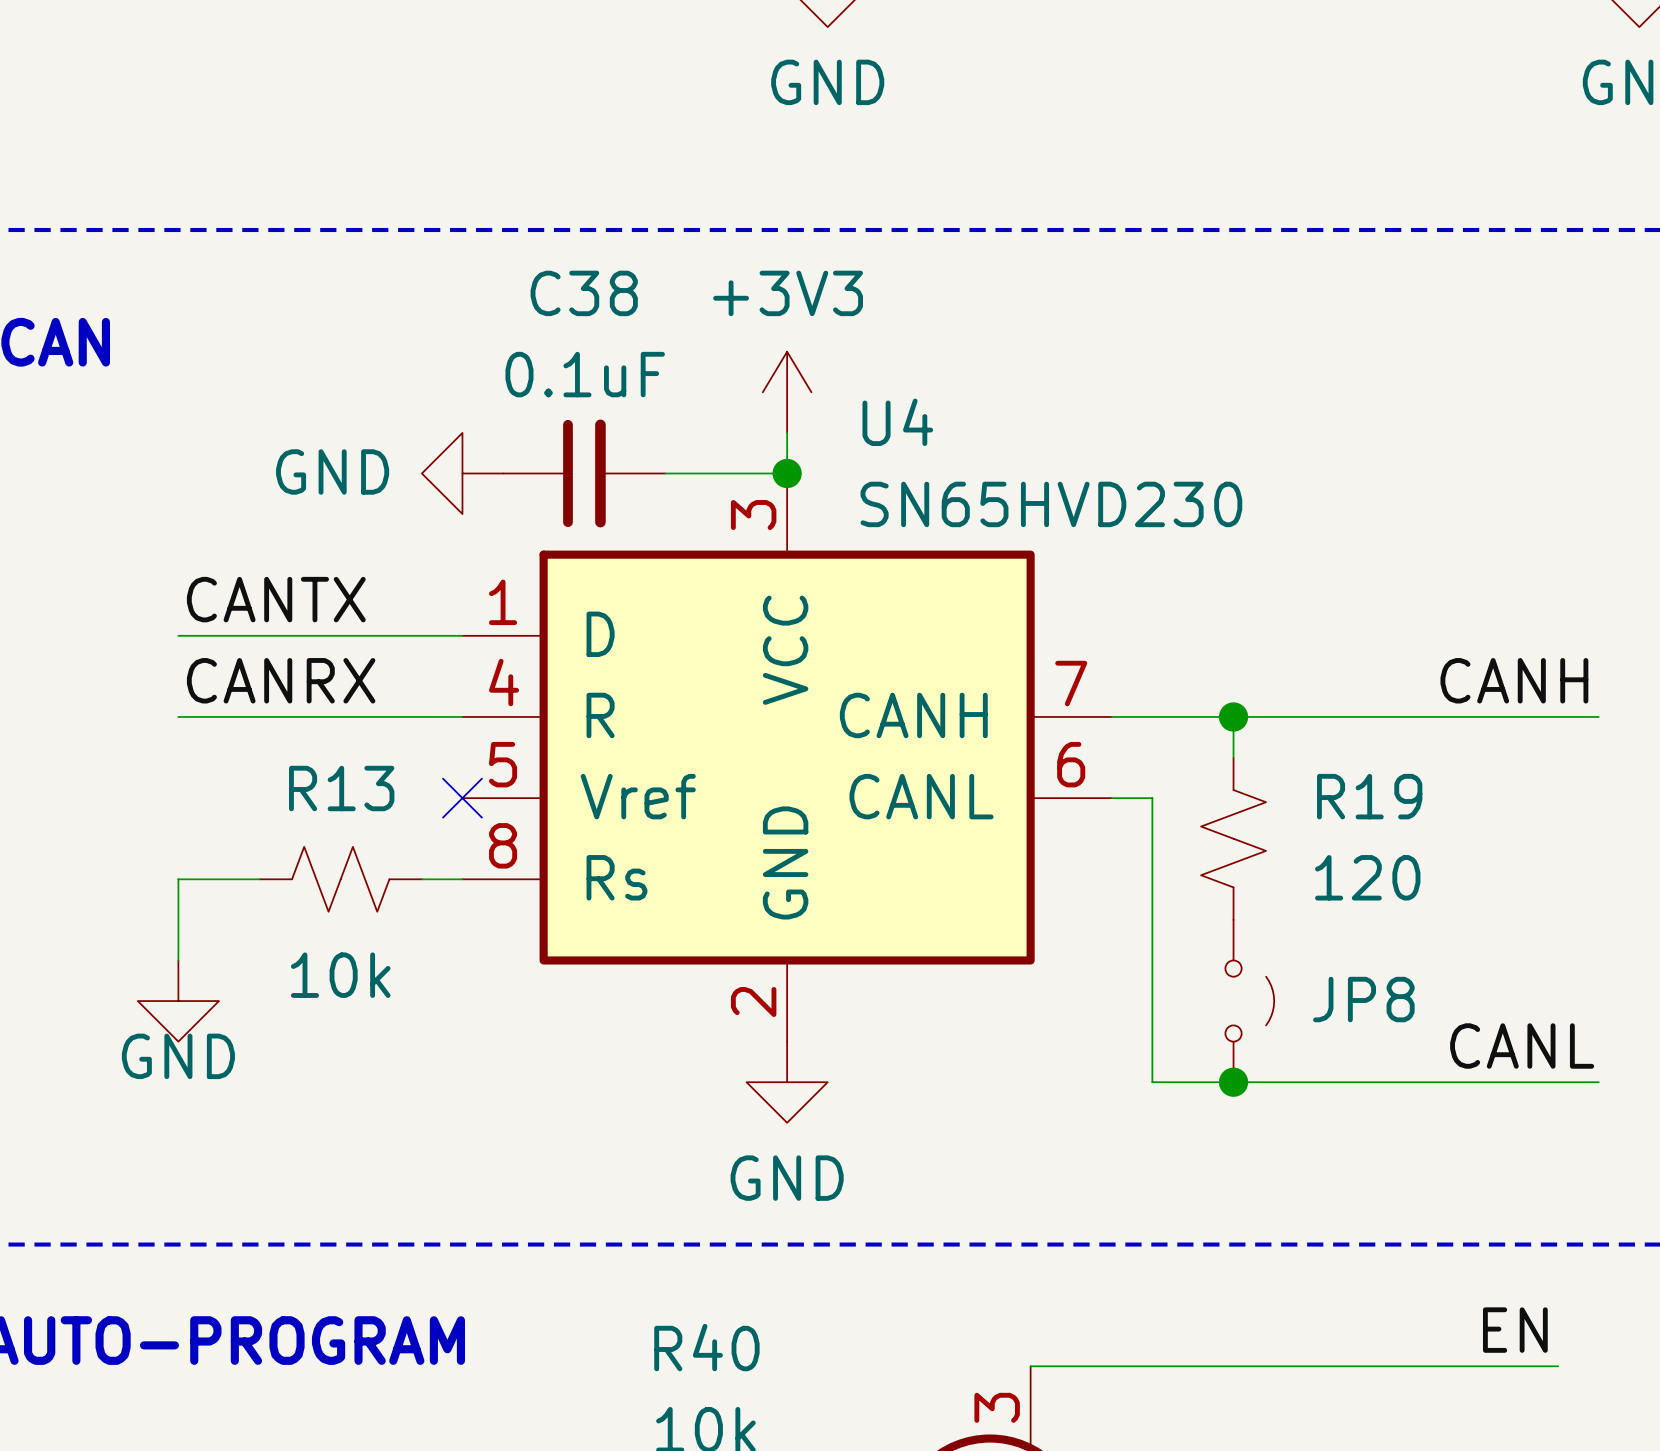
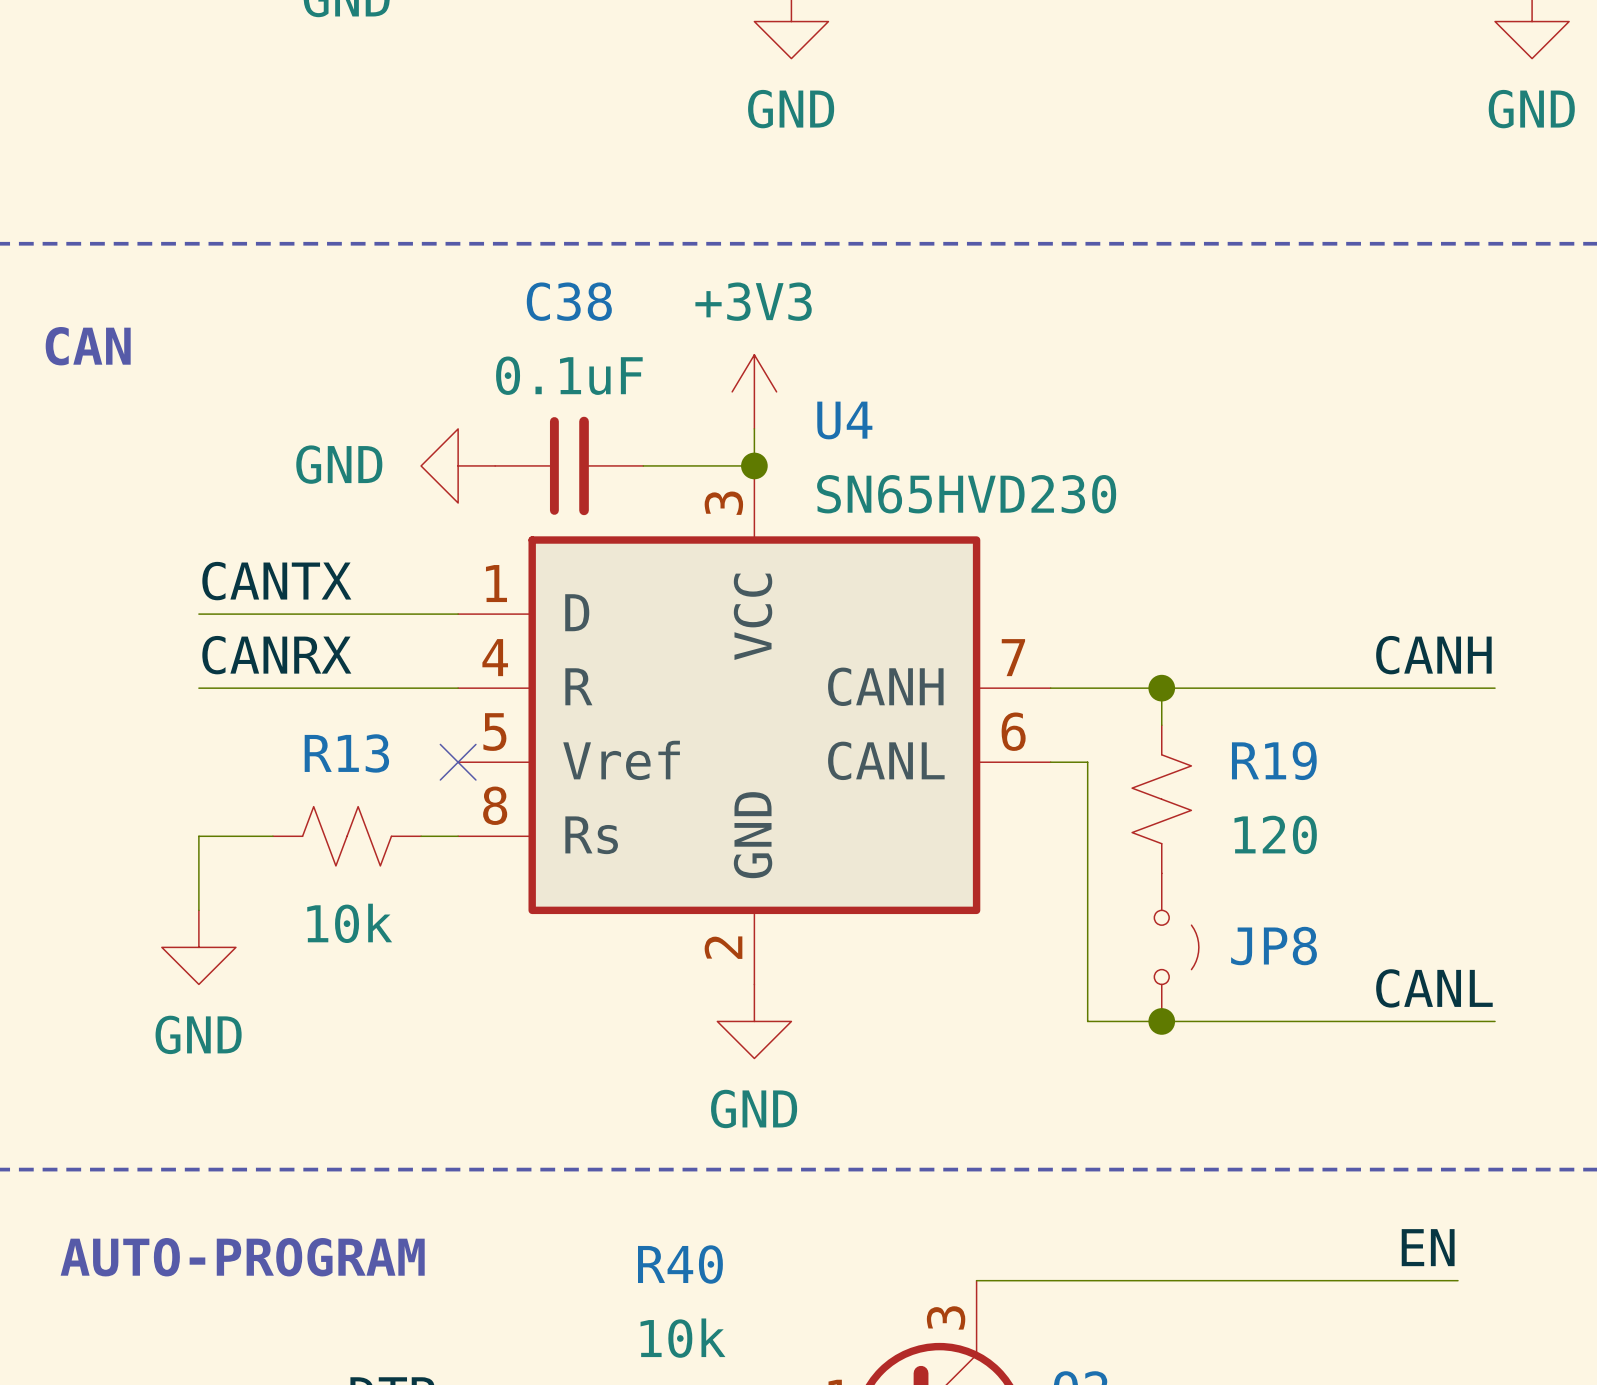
power symbol text position: GND (178, 1056) -> GND (198, 1034)

